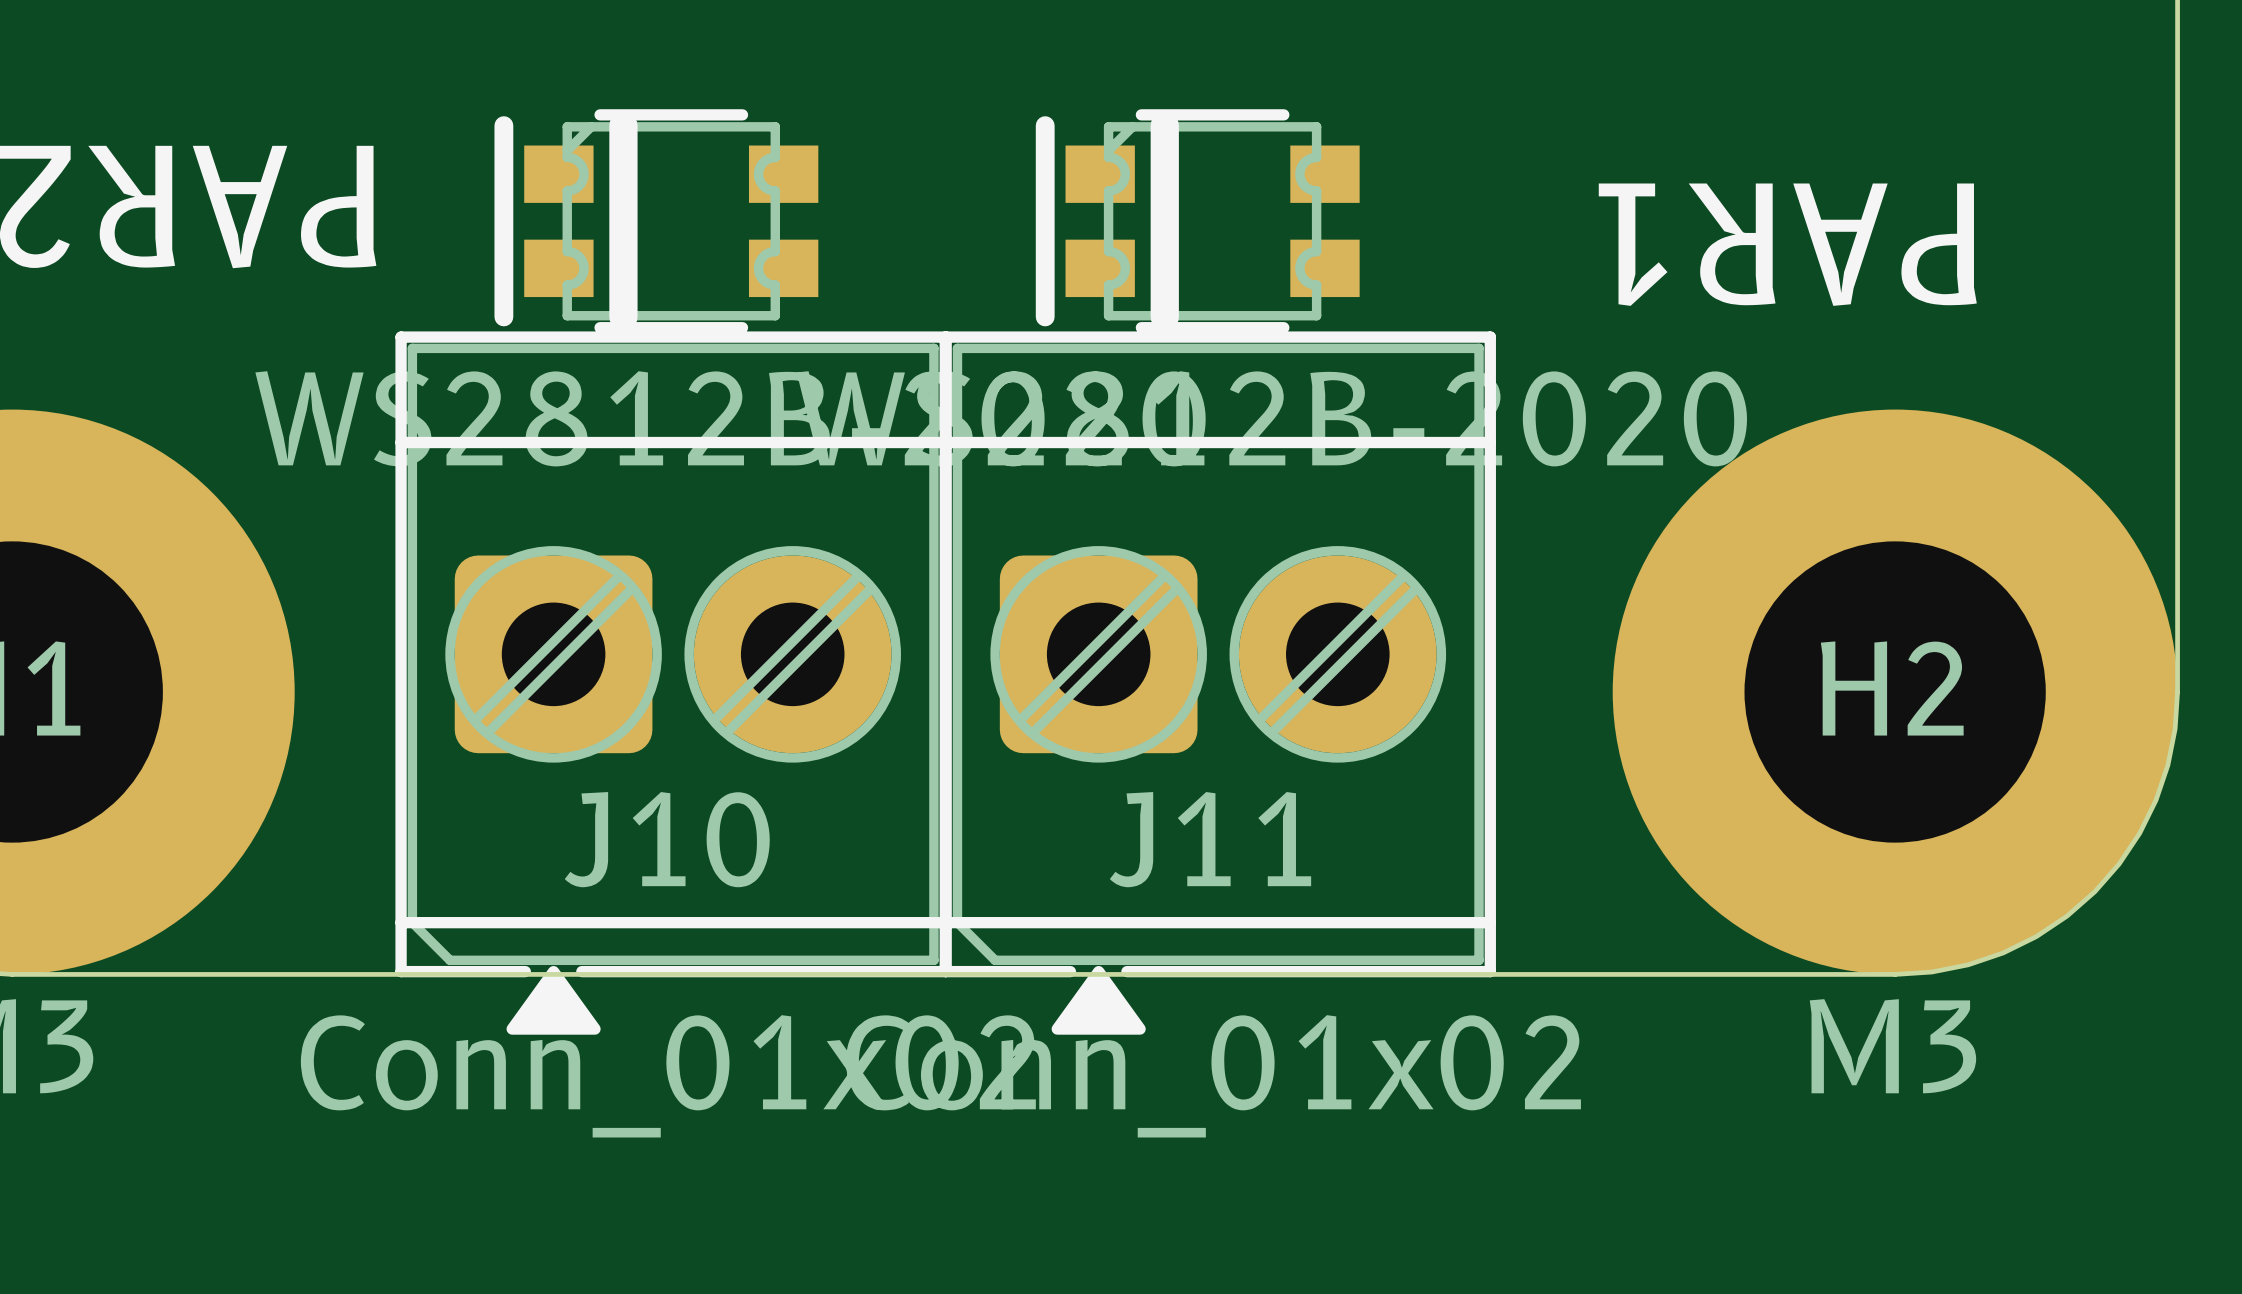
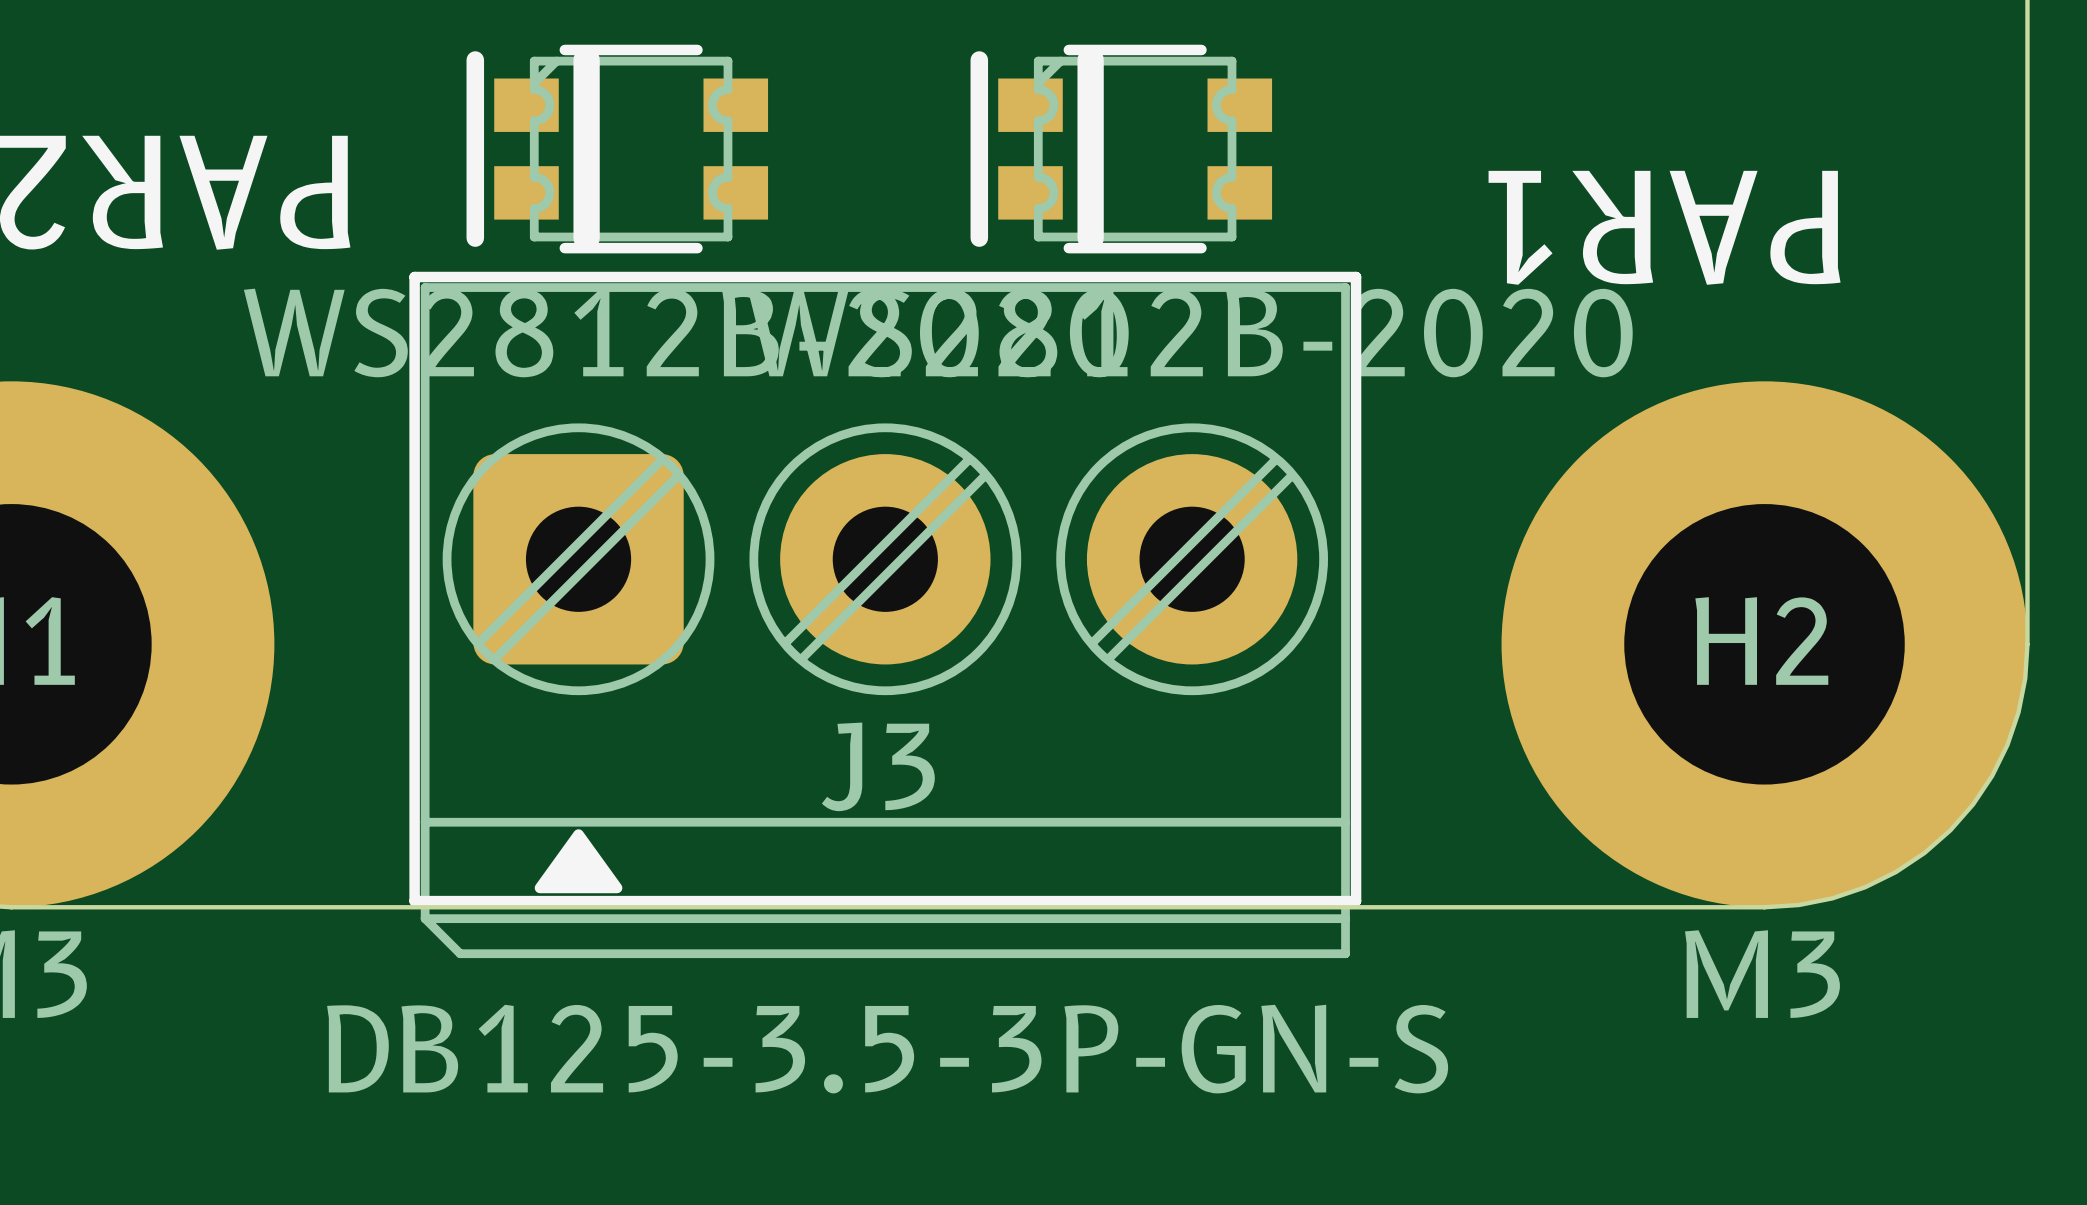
part position: (656, 221) -> (617, 149)
part position: (1197, 221) -> (1121, 149)
J3: none -> DB125-3.5-3P-GN-S (885, 614)
J10: Conn_01x02 (673, 683) -> none
J11: Conn_01x02 (1218, 683) -> none

